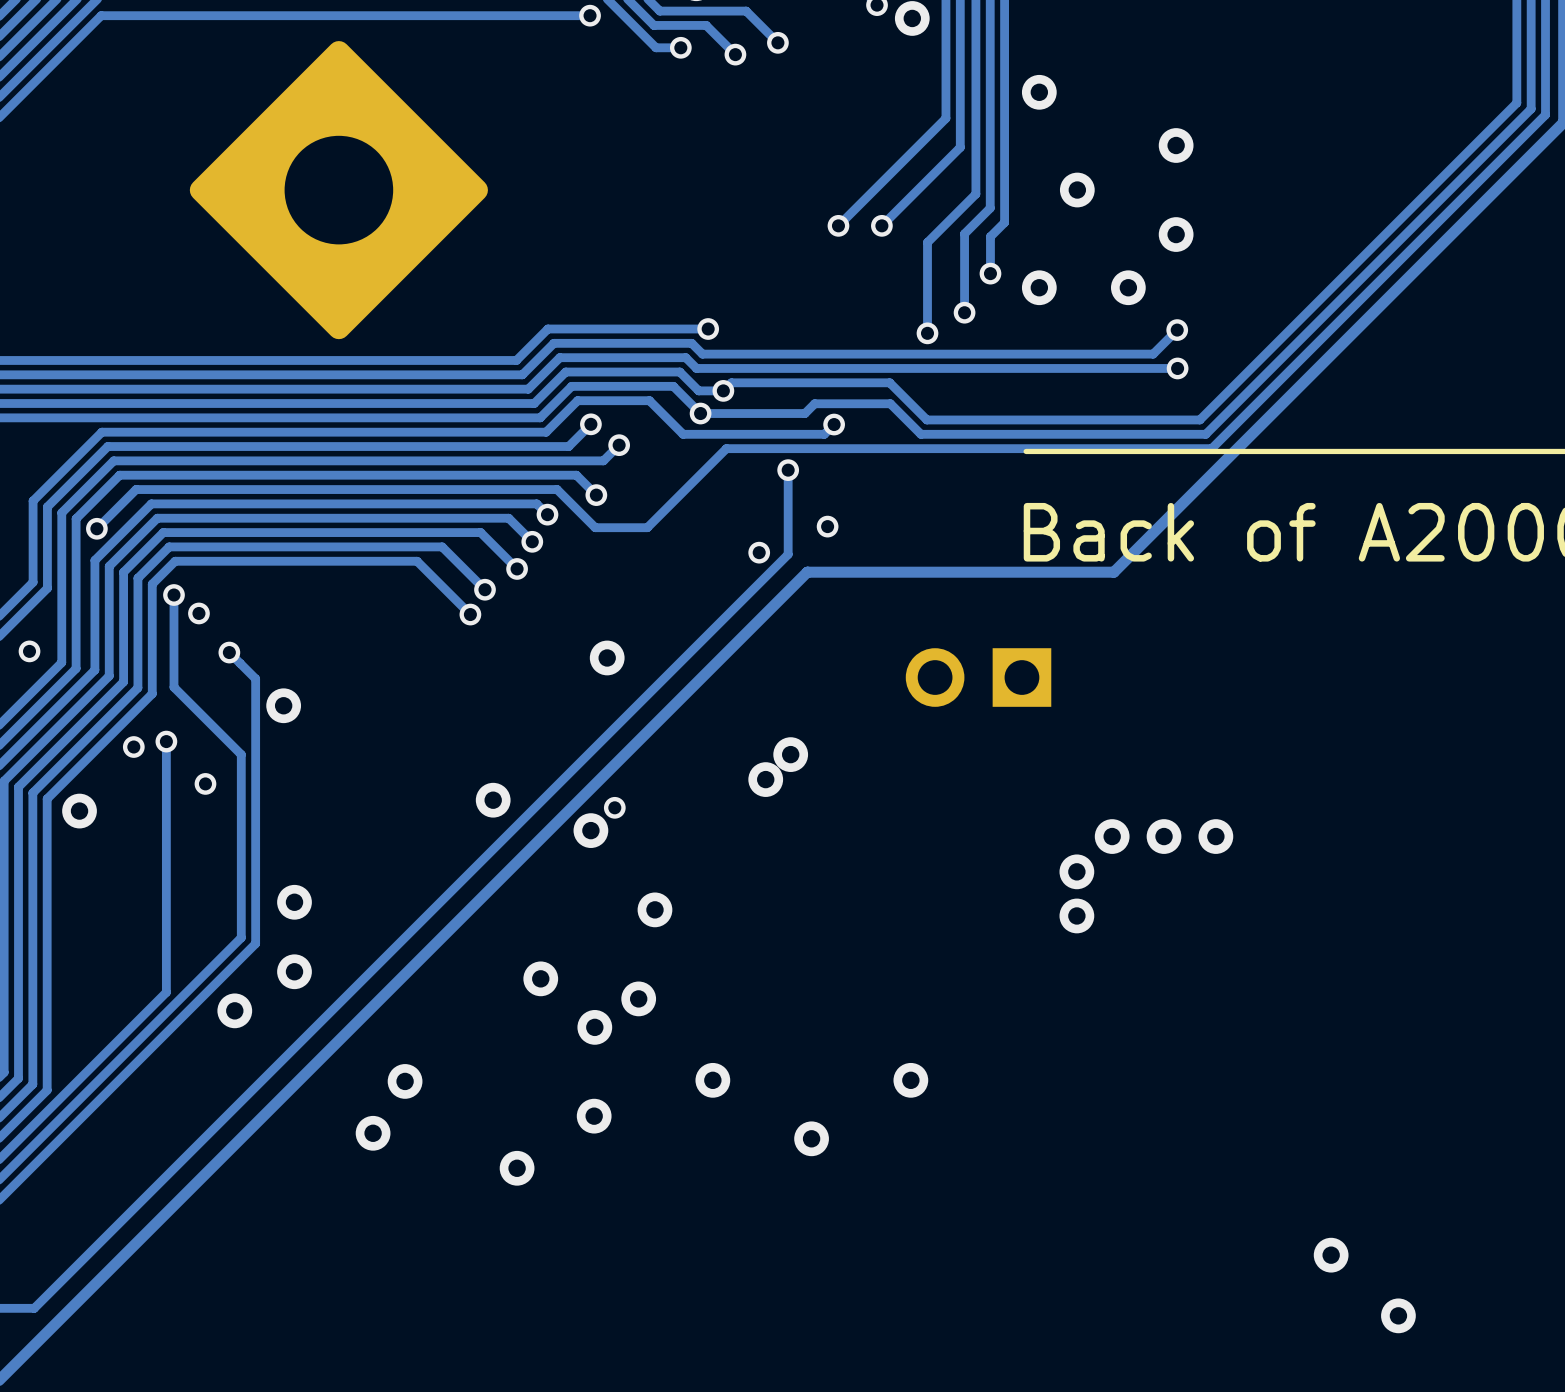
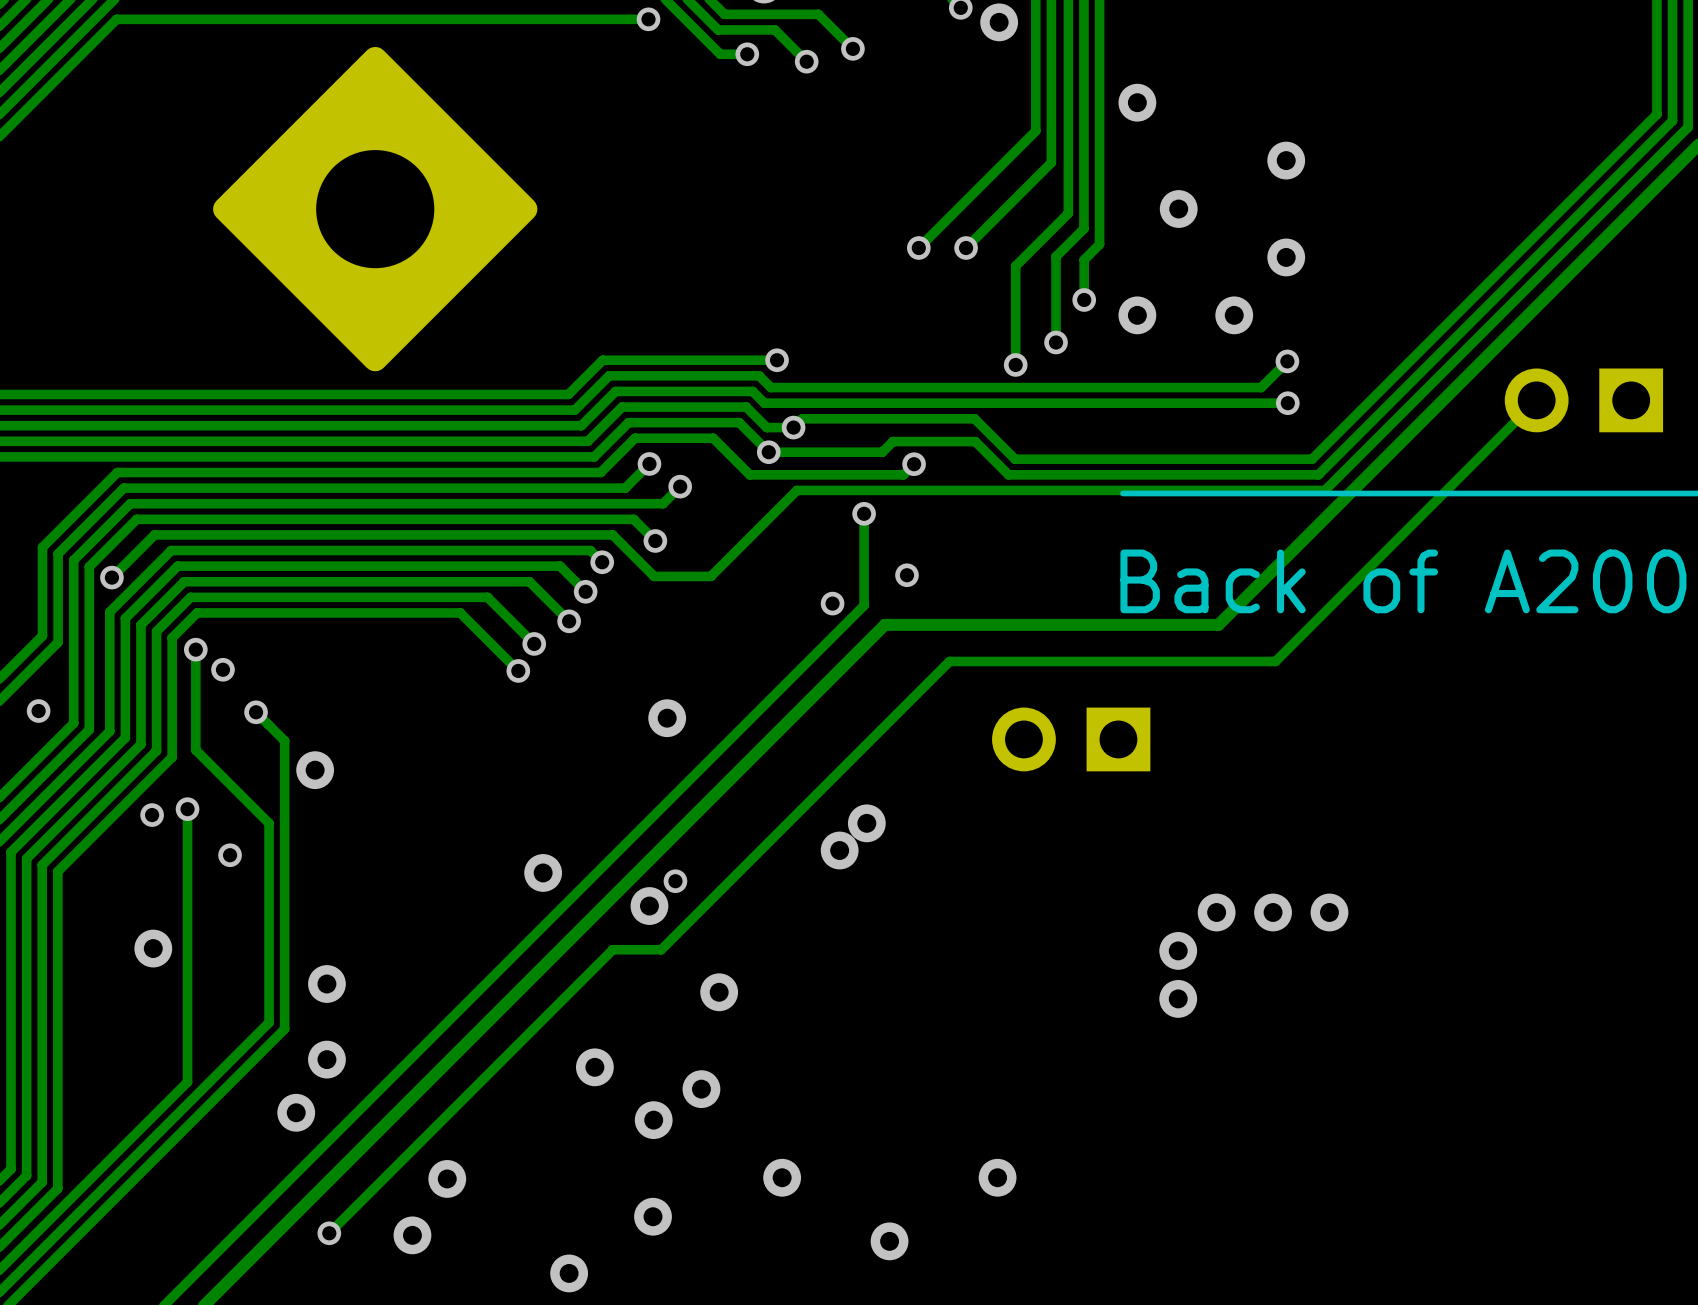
track: none -> (1536, 400) (1275, 661) (949, 661) (661, 949) (612, 949) (329, 1233)
part: none -> (1583, 400)
via position: (79, 811) -> (153, 948)
via position: (234, 1010) -> (296, 1112)
via: none -> (329, 1233)

